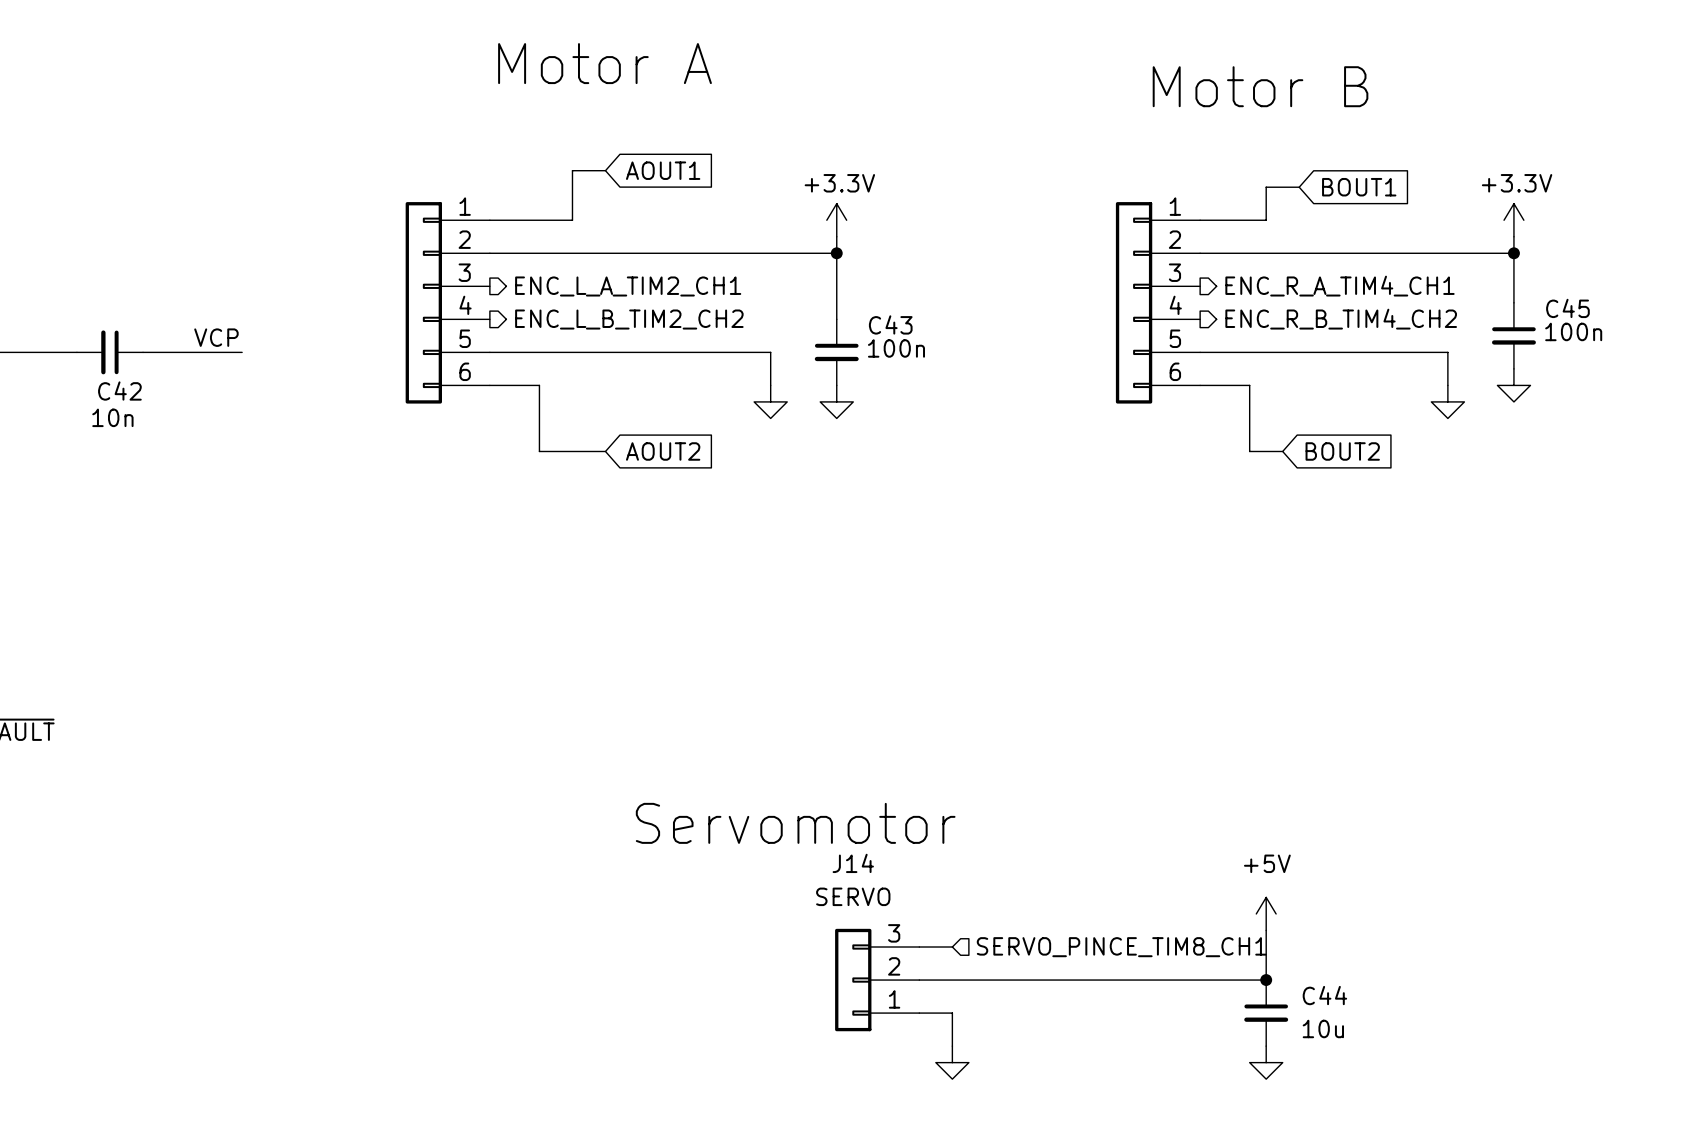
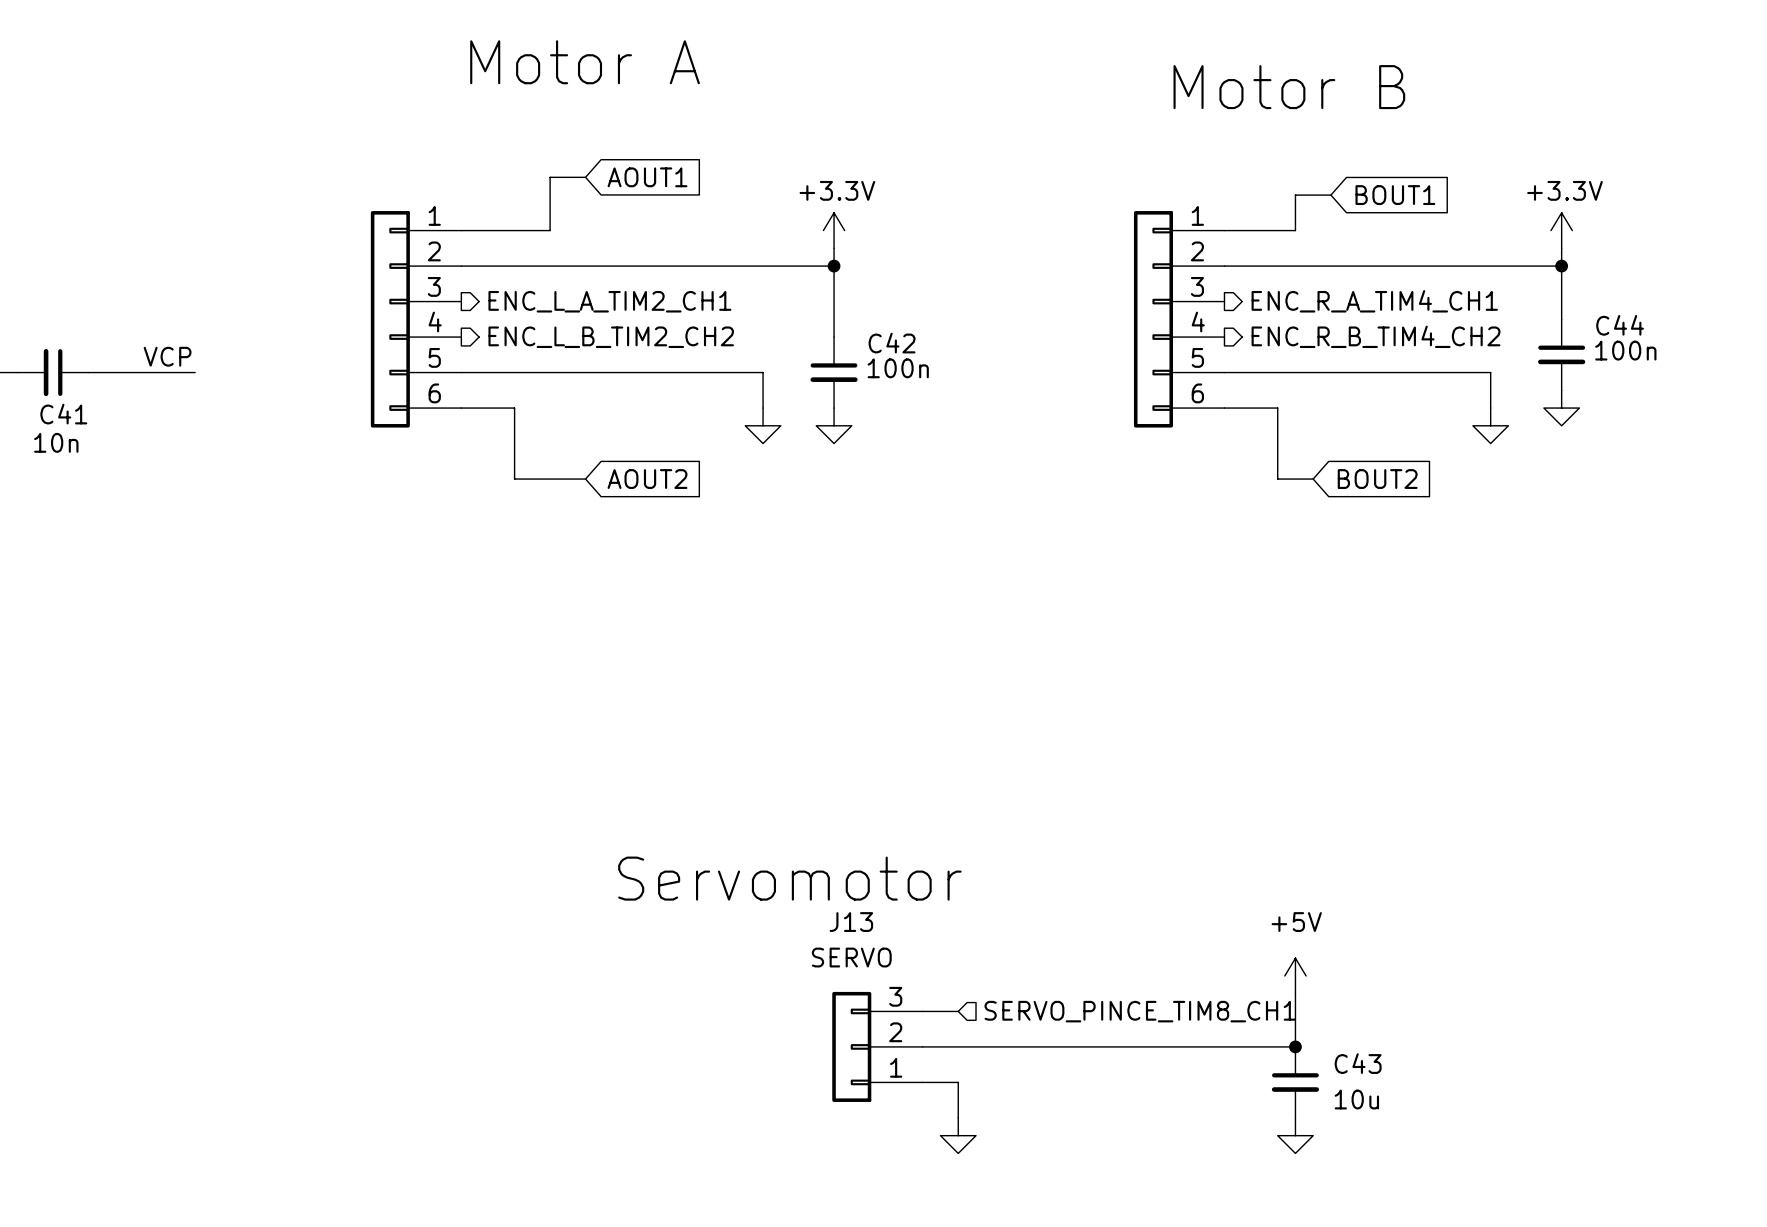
C45 name: C45 (1567, 308) -> C44 (1620, 325)
C43 name: C43 (890, 324) -> C42 (892, 343)
C42 name: C42 (119, 391) -> C41 (63, 414)
J14 name: J14 (853, 863) -> J13 (851, 922)
C44 name: C44 (1324, 995) -> C43 (1358, 1063)

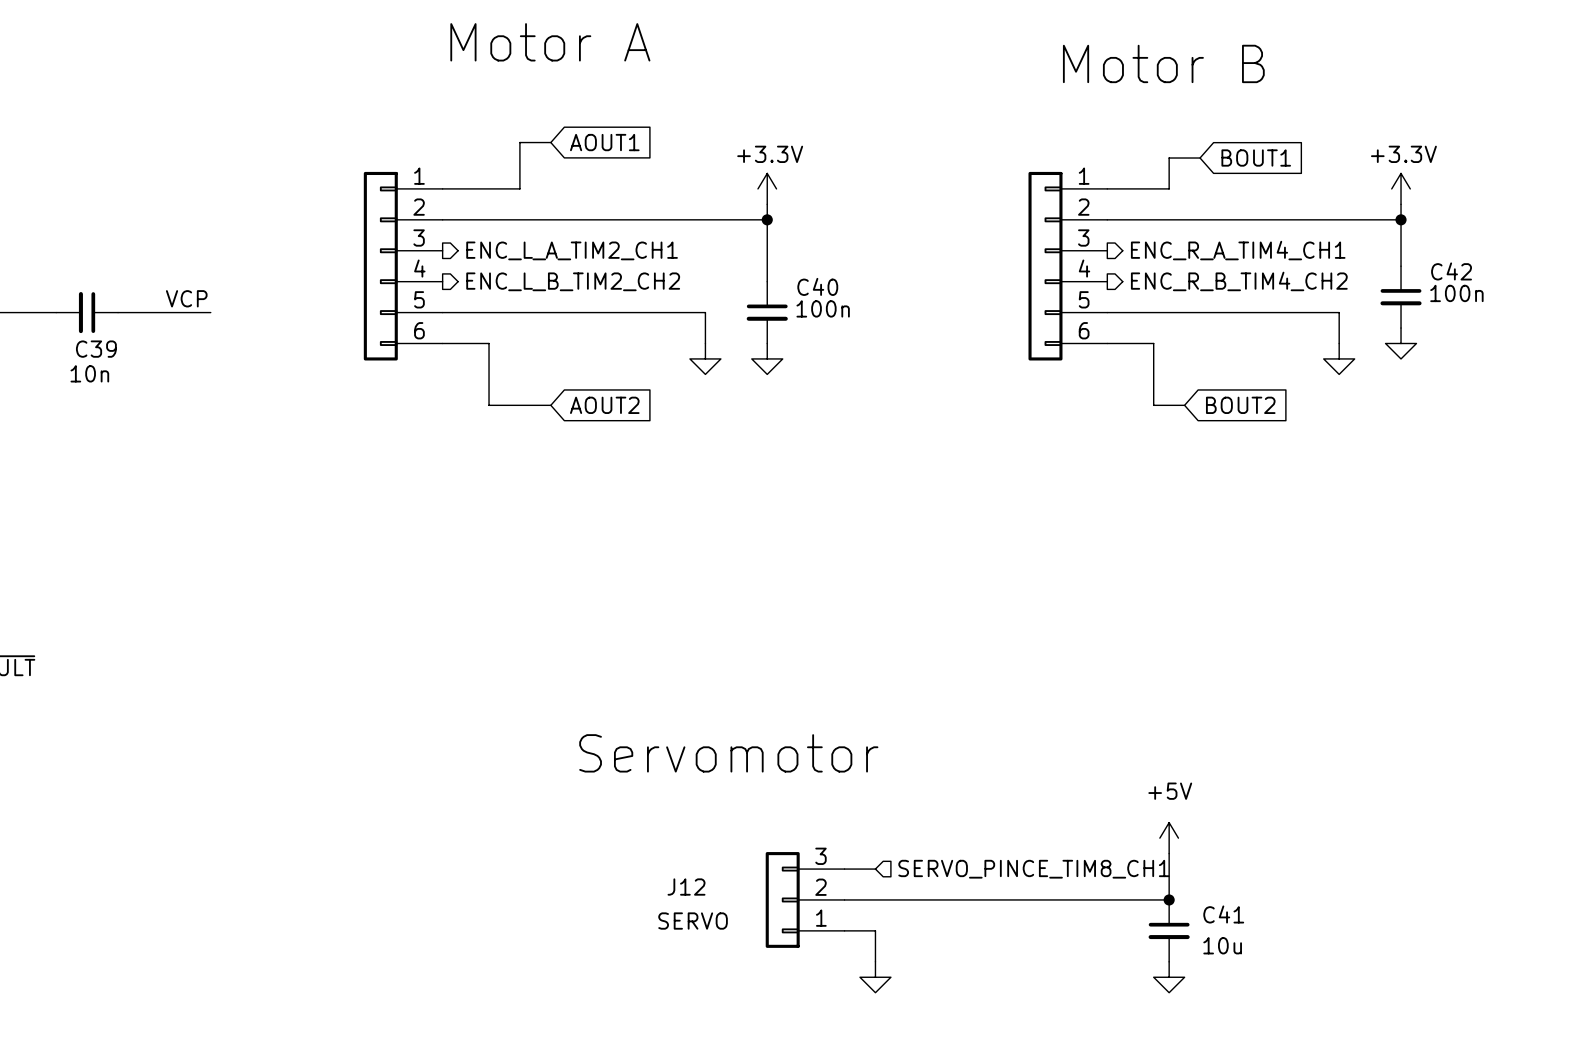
C44 name: C44 (1620, 325) -> C42 (1451, 271)
C42 name: C42 (892, 343) -> C40 (817, 286)
C41 name: C41 (63, 414) -> C39 (96, 349)
J13 name: J13 (851, 922) -> J12 (686, 887)
J13 value position: SERVO (851, 957) -> SERVO (693, 921)
C43 name: C43 (1358, 1063) -> C41 (1223, 914)

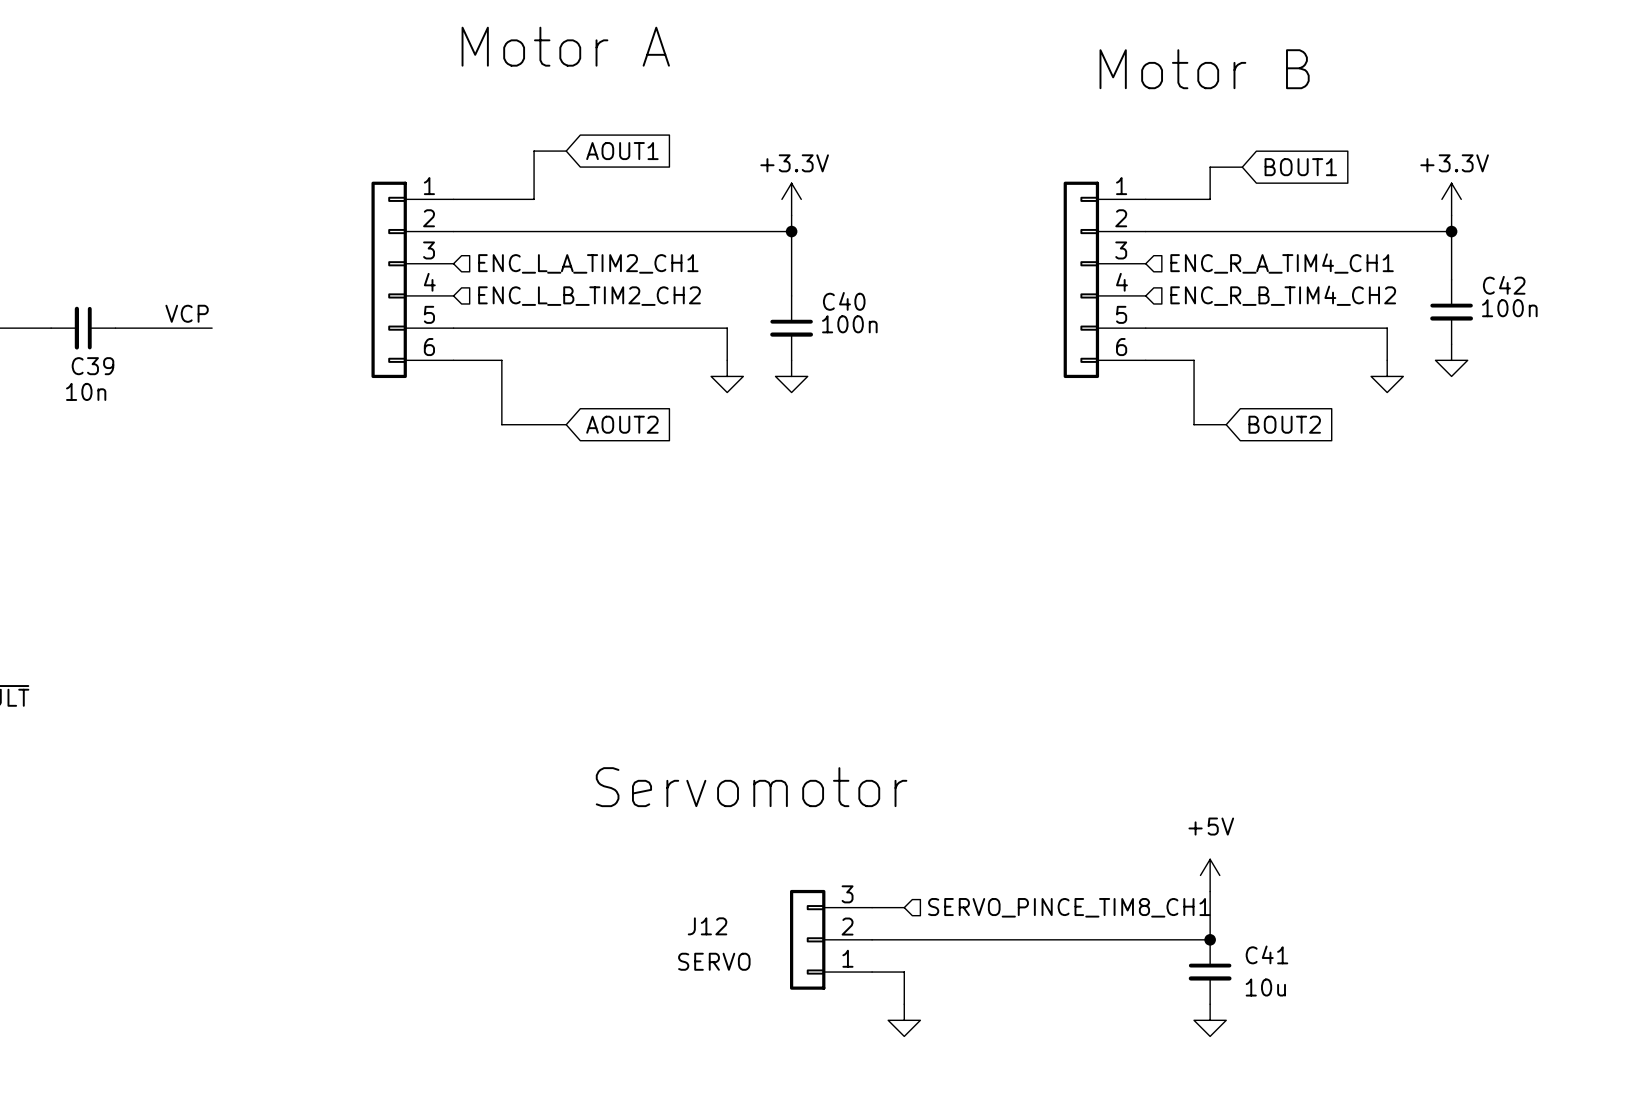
hierarchical label shape: output (572, 250) -> input (588, 263)
hierarchical label shape: output (1238, 250) -> input (1282, 263)
hierarchical label shape: output (573, 281) -> input (589, 296)
hierarchical label shape: output (1239, 281) -> input (1283, 295)

